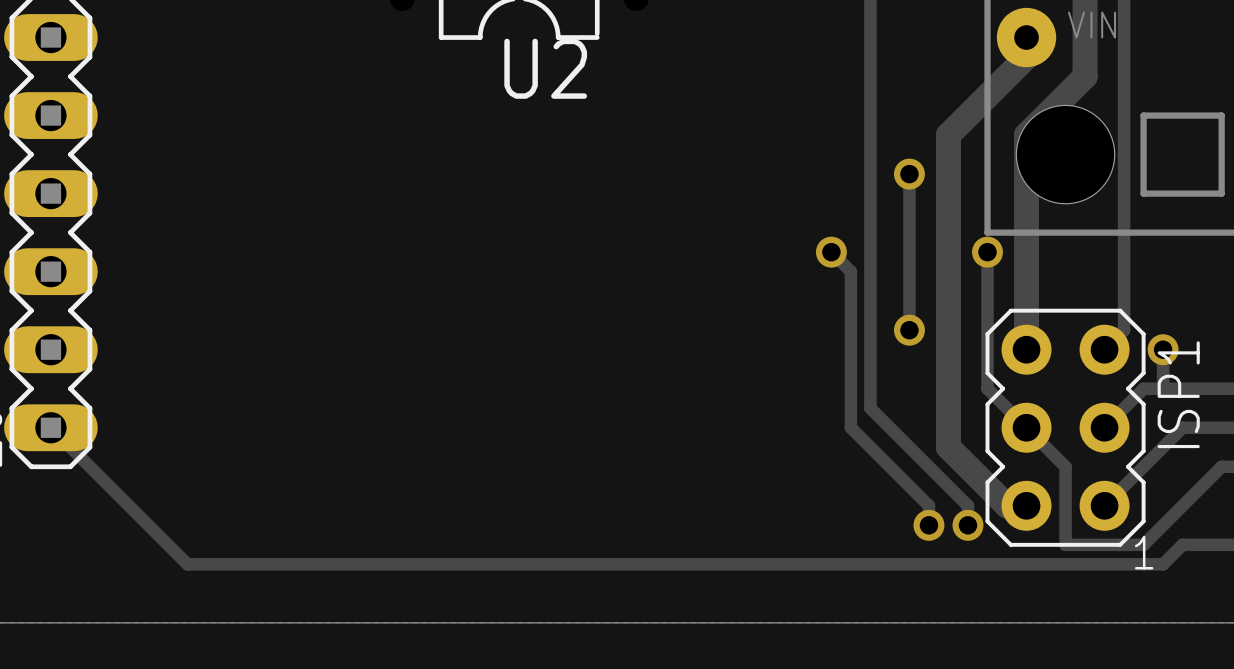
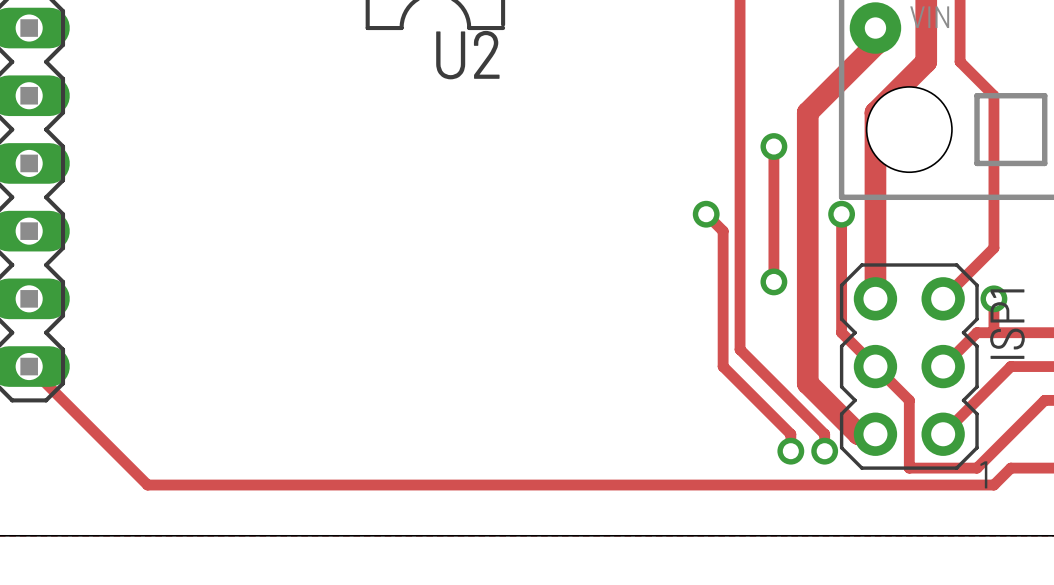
track: (1124, 76) (1124, 330) -> (960, 61) (993, 95) (993, 248) (960, 281)

